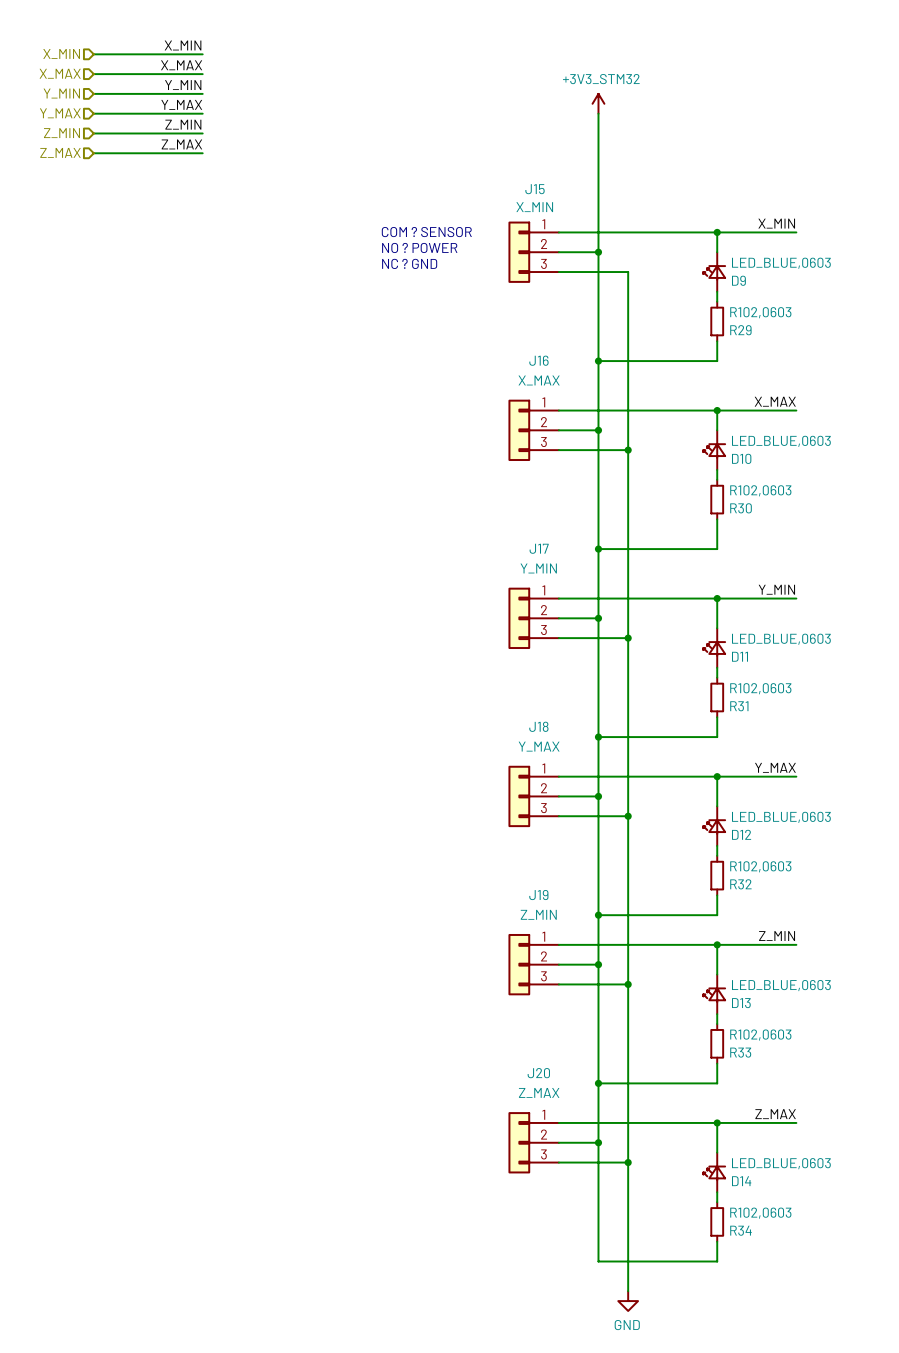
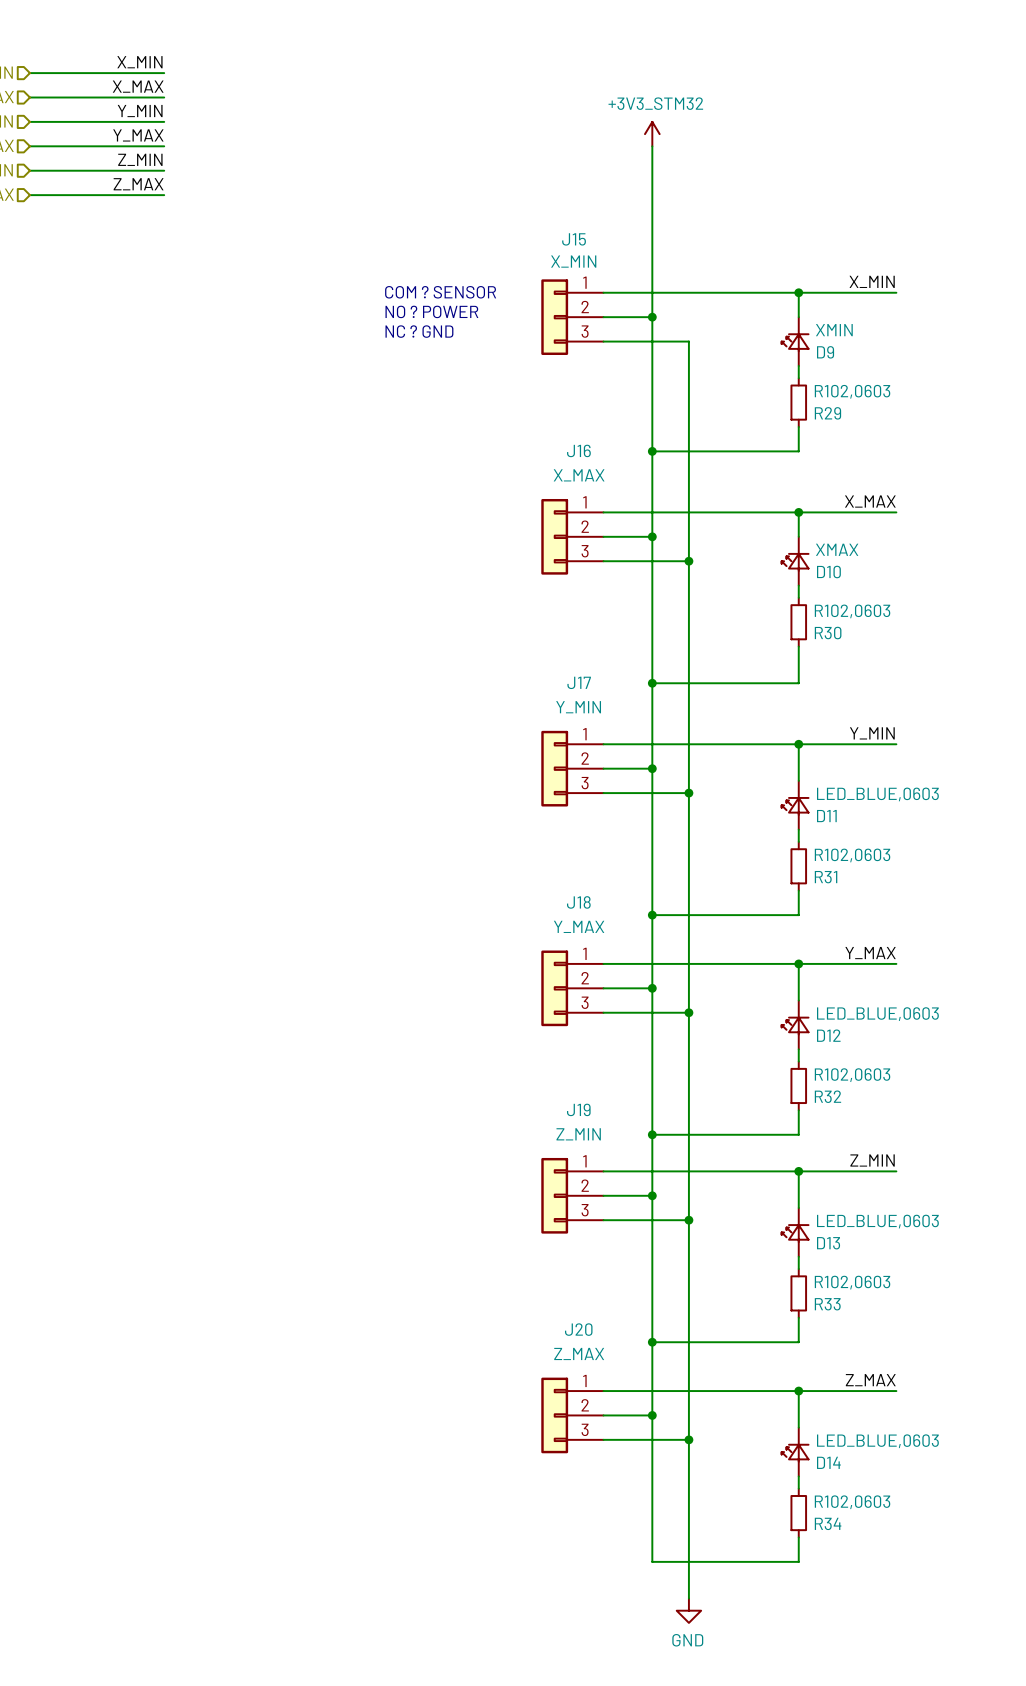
D9 value: LED_BLUE,0603 (781, 263) -> XMIN (834, 330)
D10 value: LED_BLUE,0603 (781, 441) -> XMAX (837, 549)

